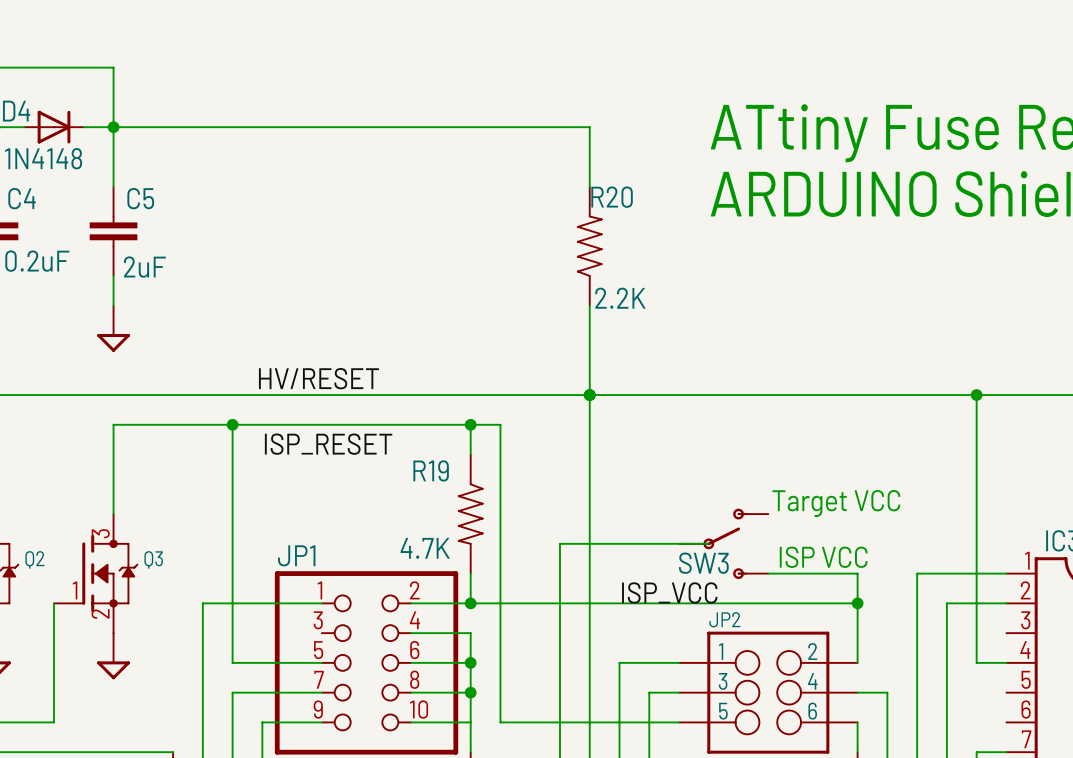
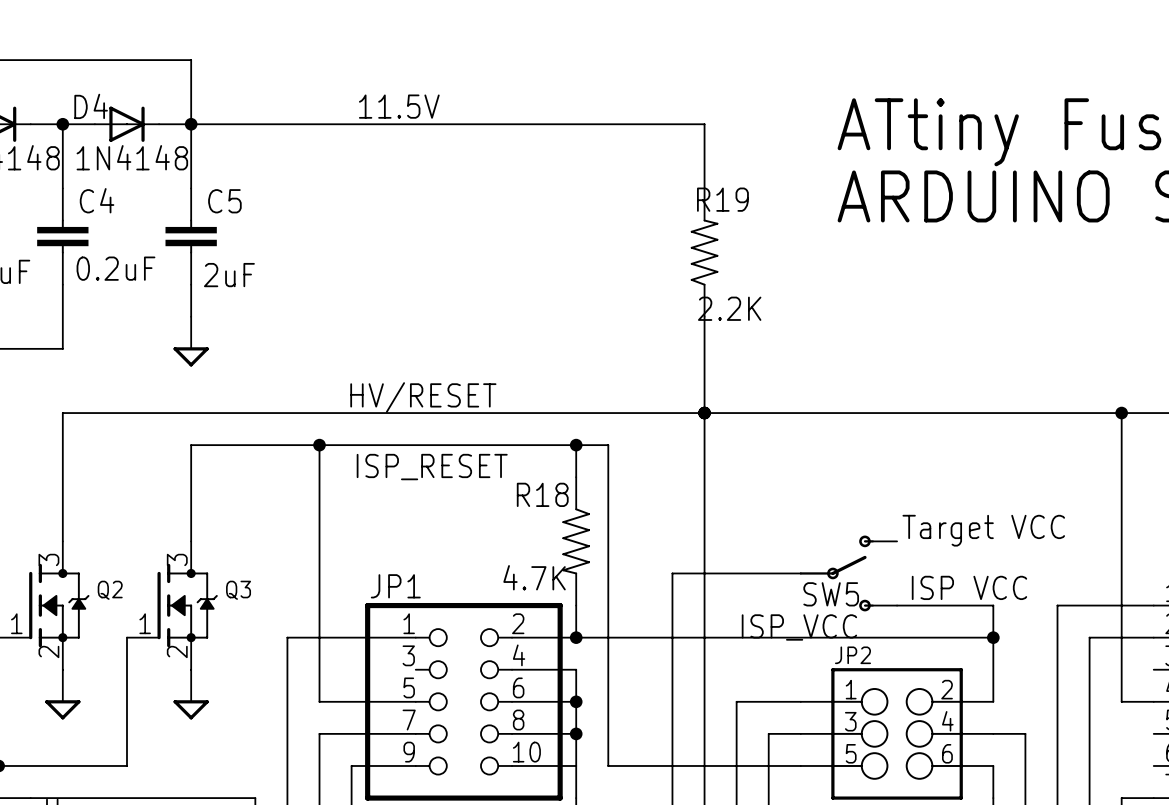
label: none -> 11.5V (399, 106)
R20 name: R20 (612, 197) -> R19 (722, 199)
R19 name: R19 (431, 470) -> R18 (542, 494)
SW3 name: SW3 (703, 563) -> SW5 (831, 594)

